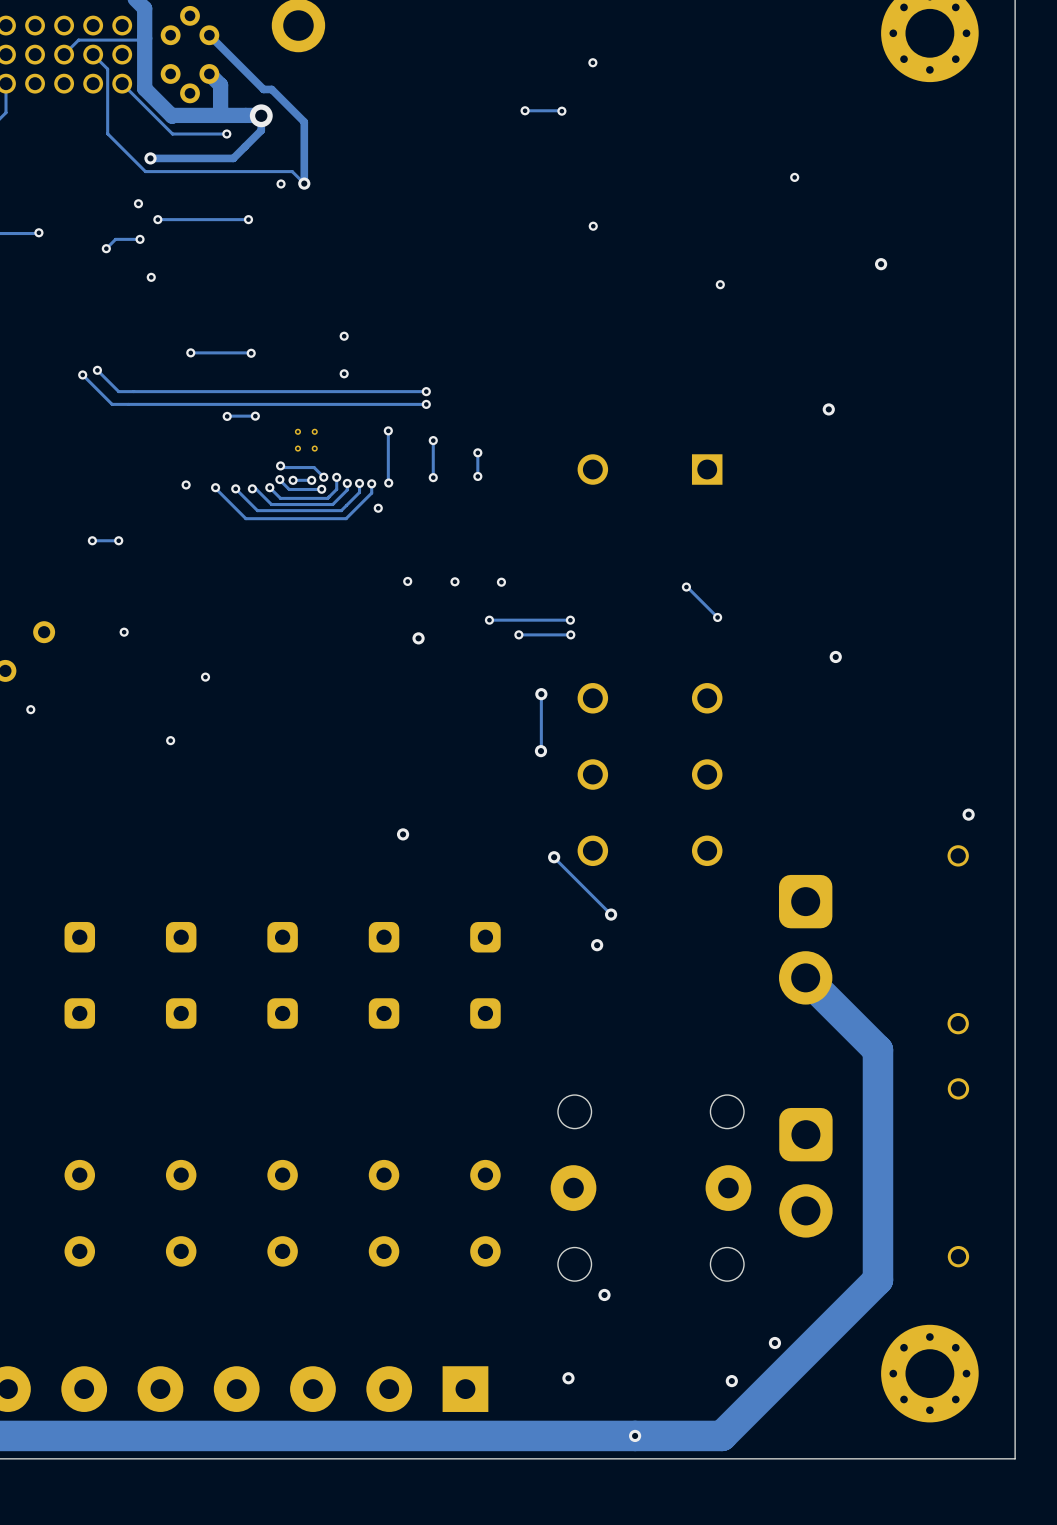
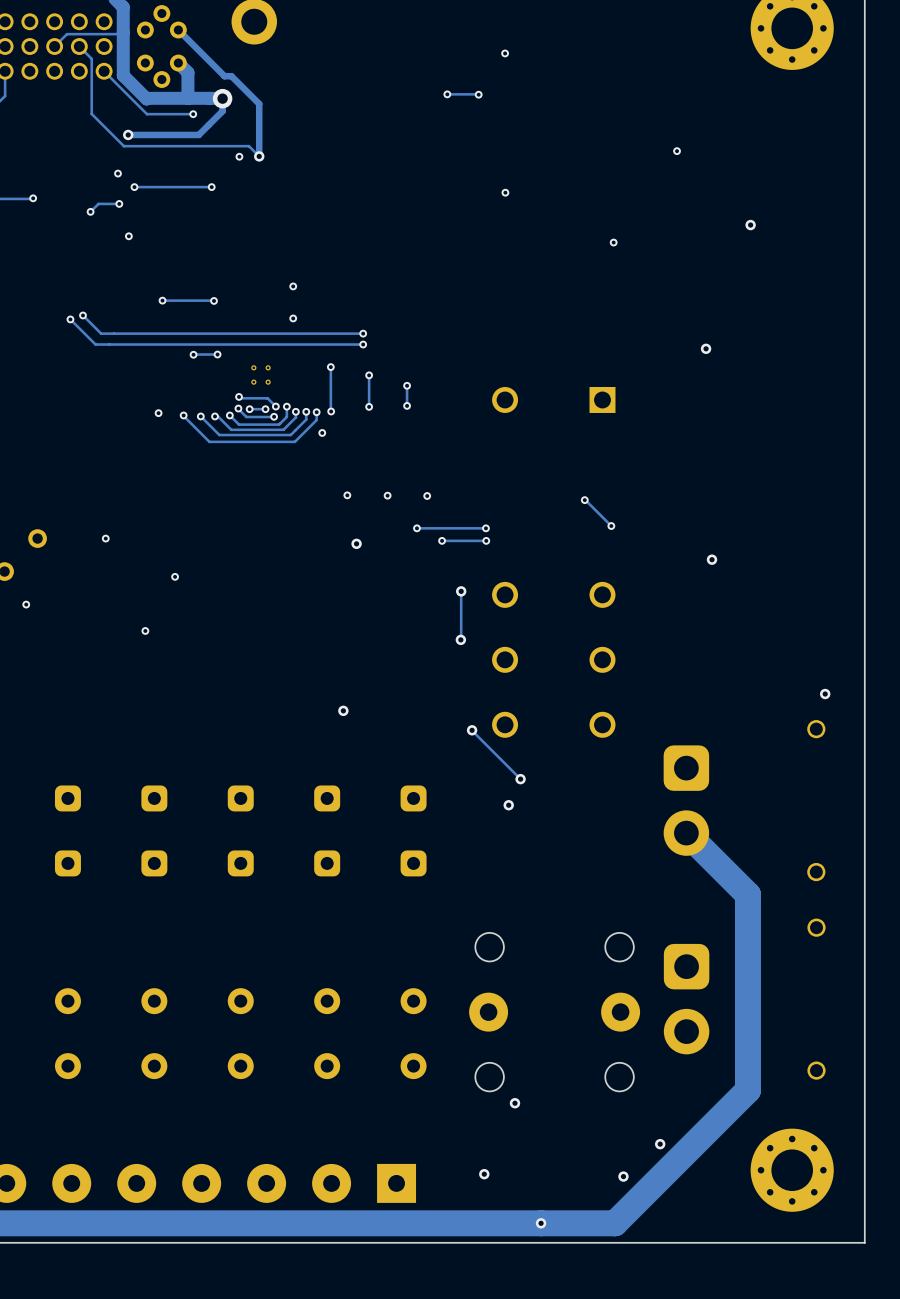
via: (92, 540) -> none
track: (118, 540) (92, 540) -> none
via: (118, 540) -> none

